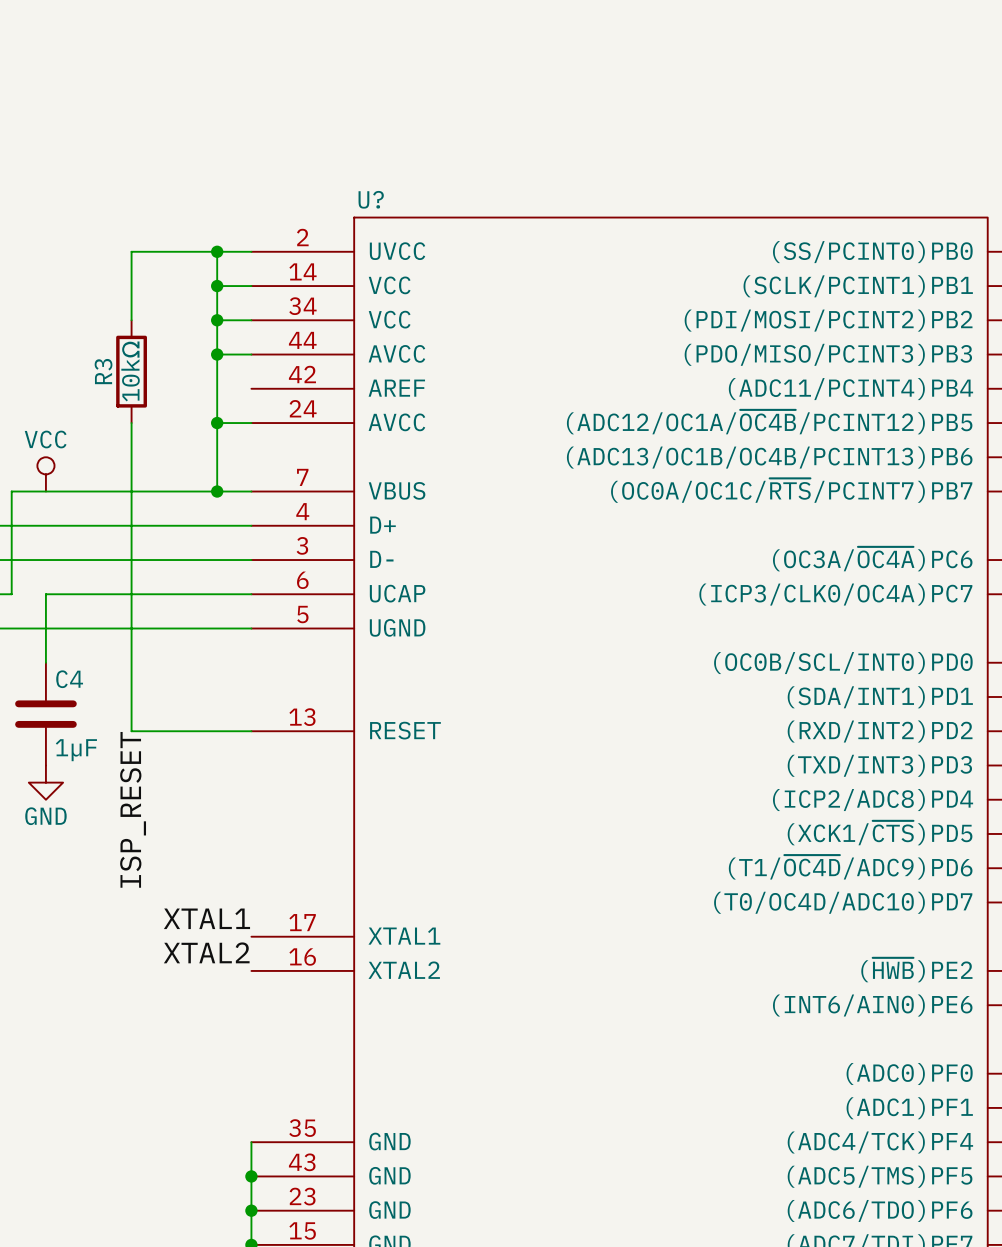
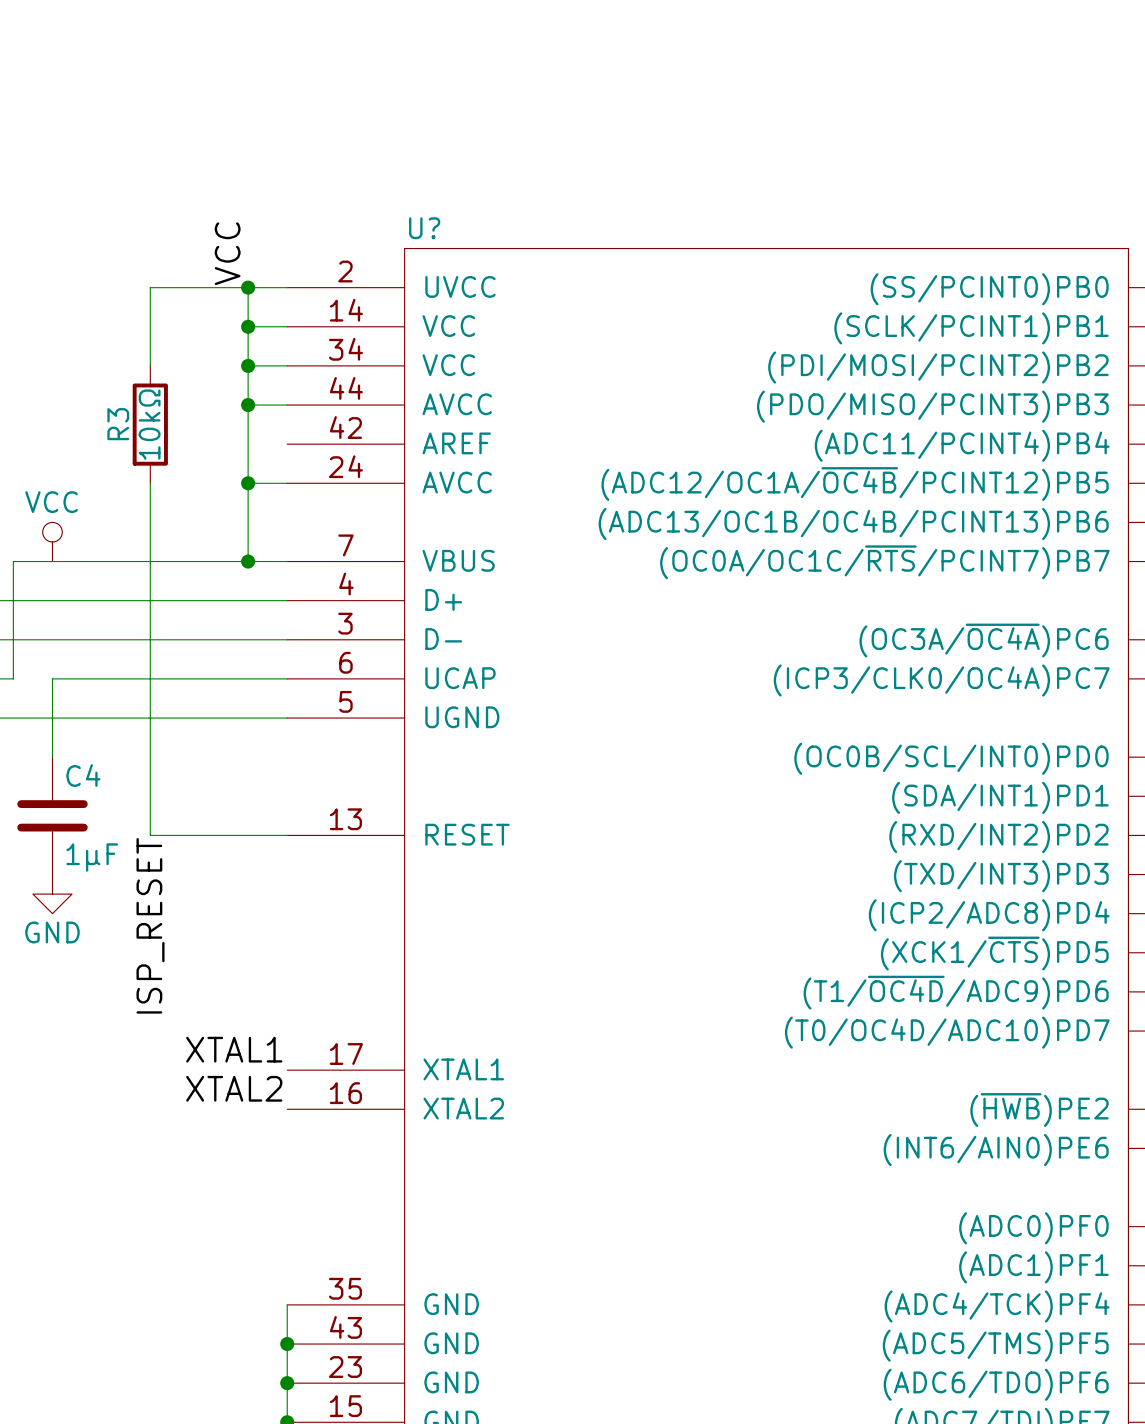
label: none -> VCC (227, 253)

